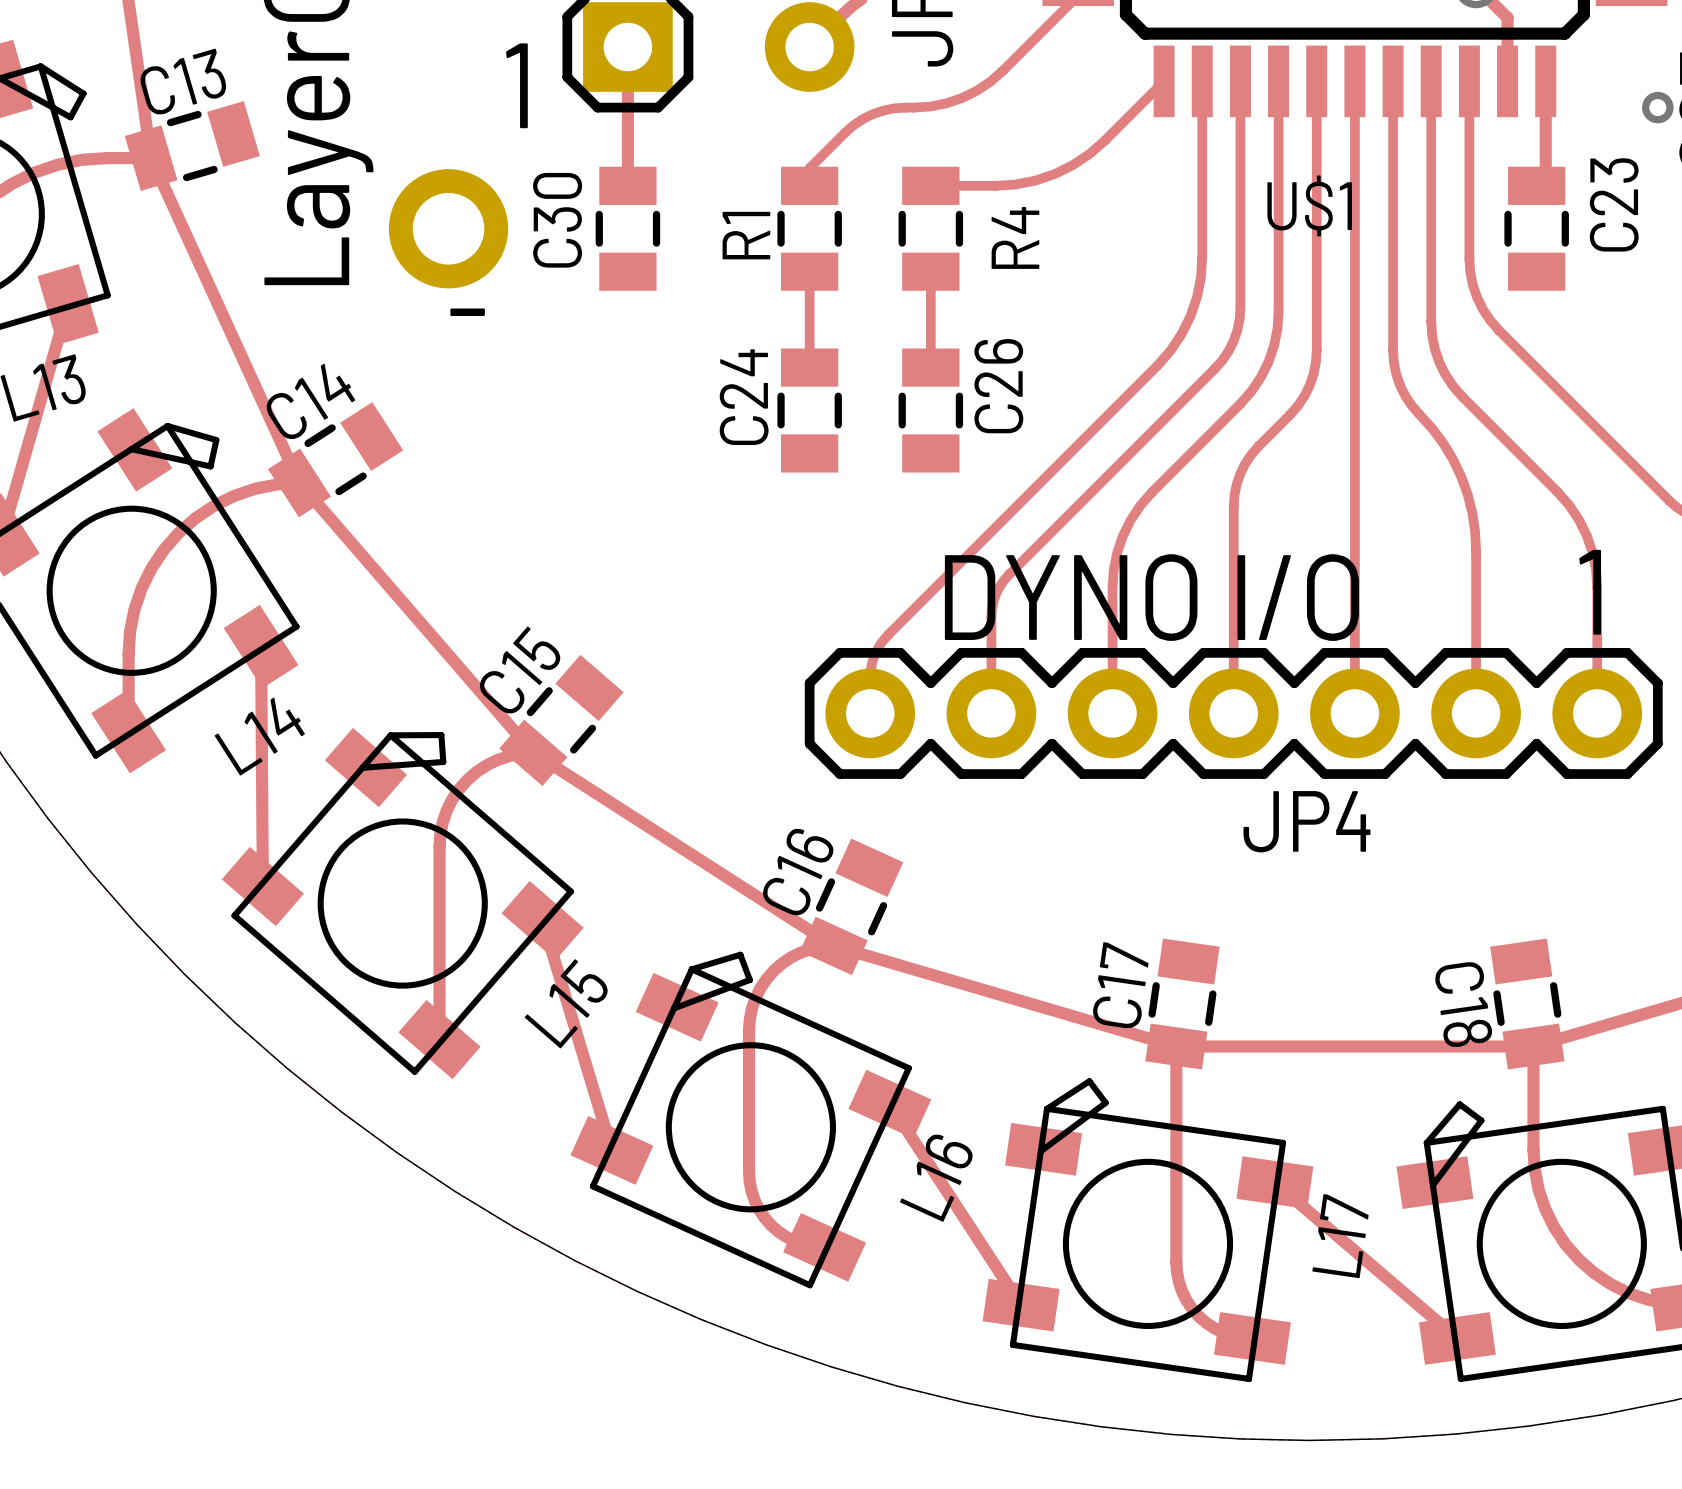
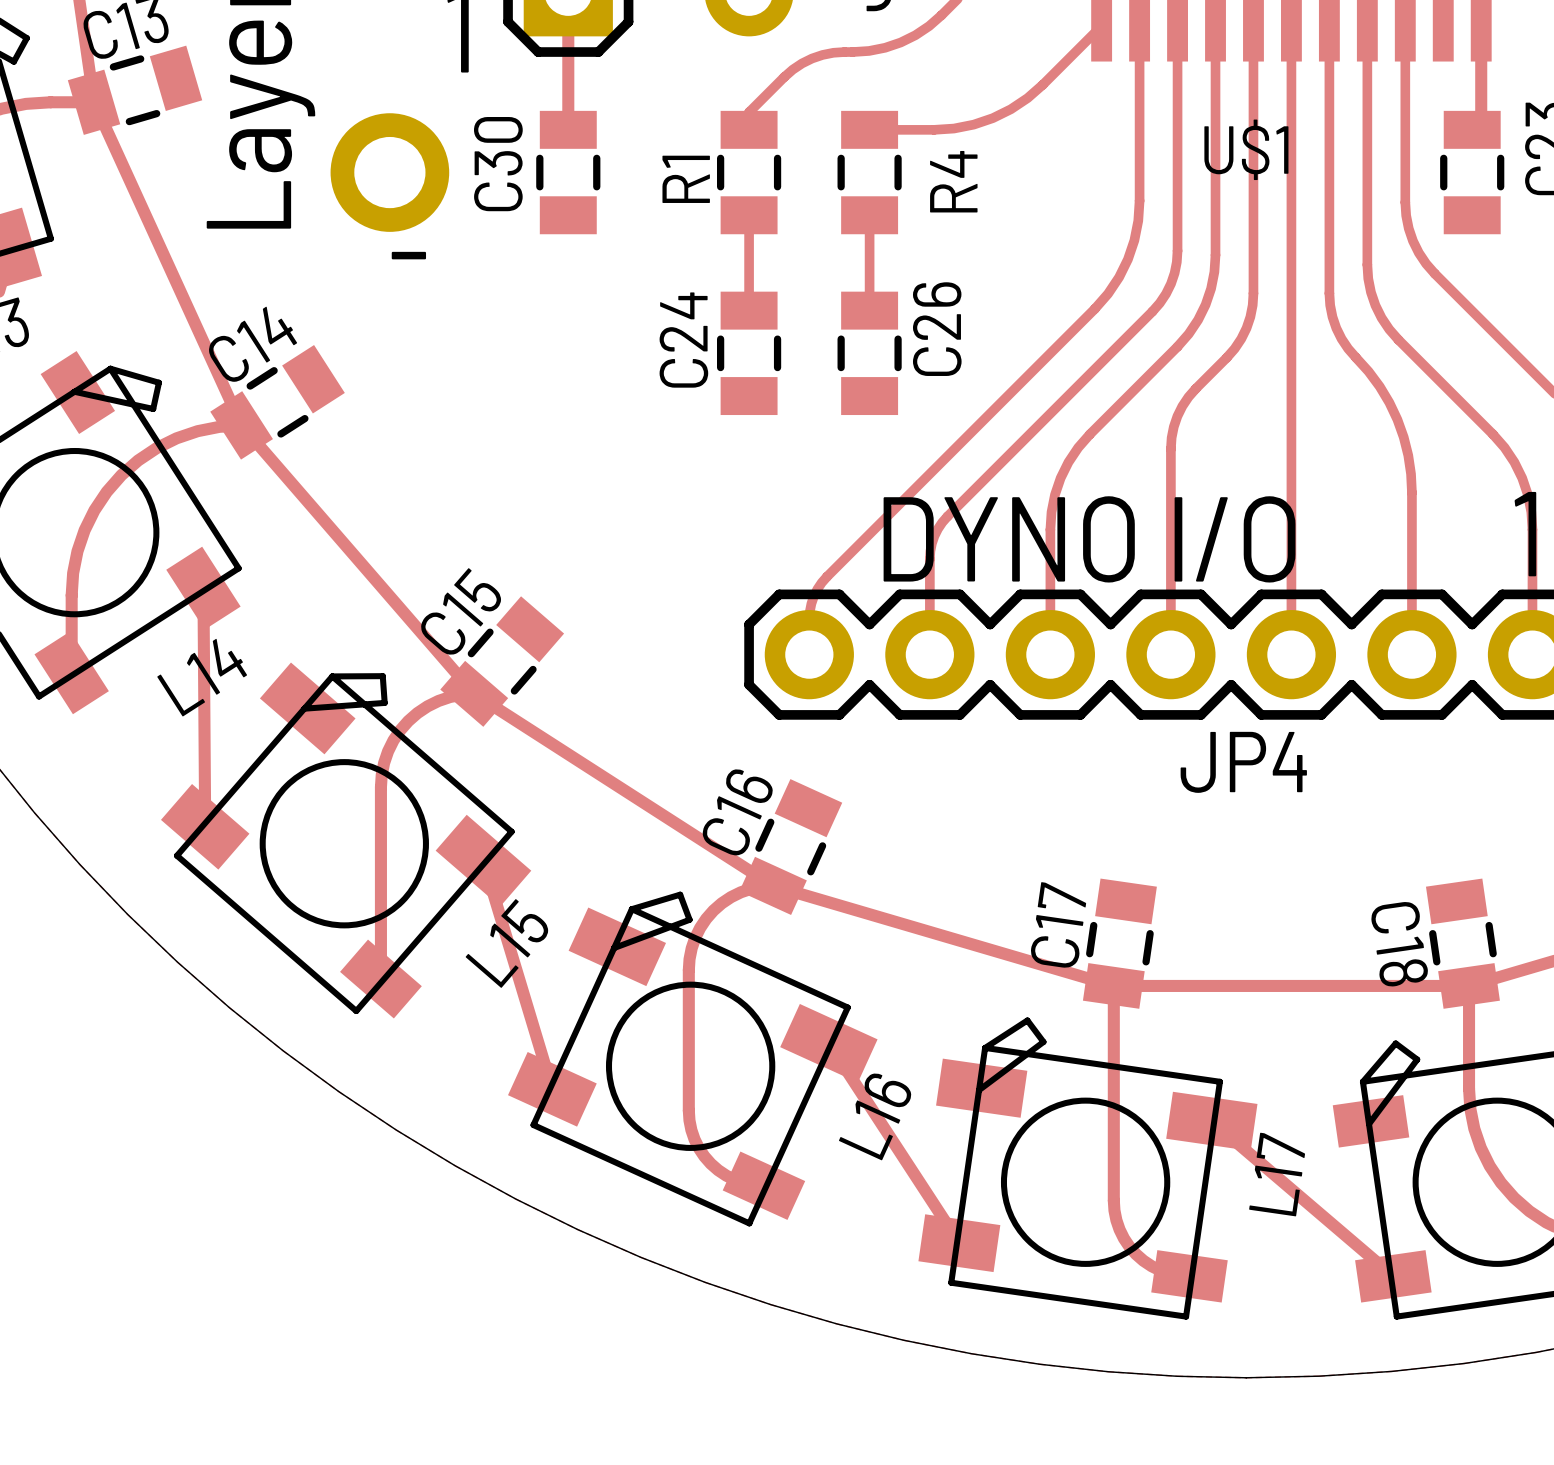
L15 footprint: [221, 727, 584, 1080] -> [160, 662, 532, 1019]
L16 footprint: [570, 951, 932, 1289] -> [508, 891, 878, 1227]
L17 footprint: [982, 1078, 1314, 1382] -> [918, 1017, 1258, 1320]

